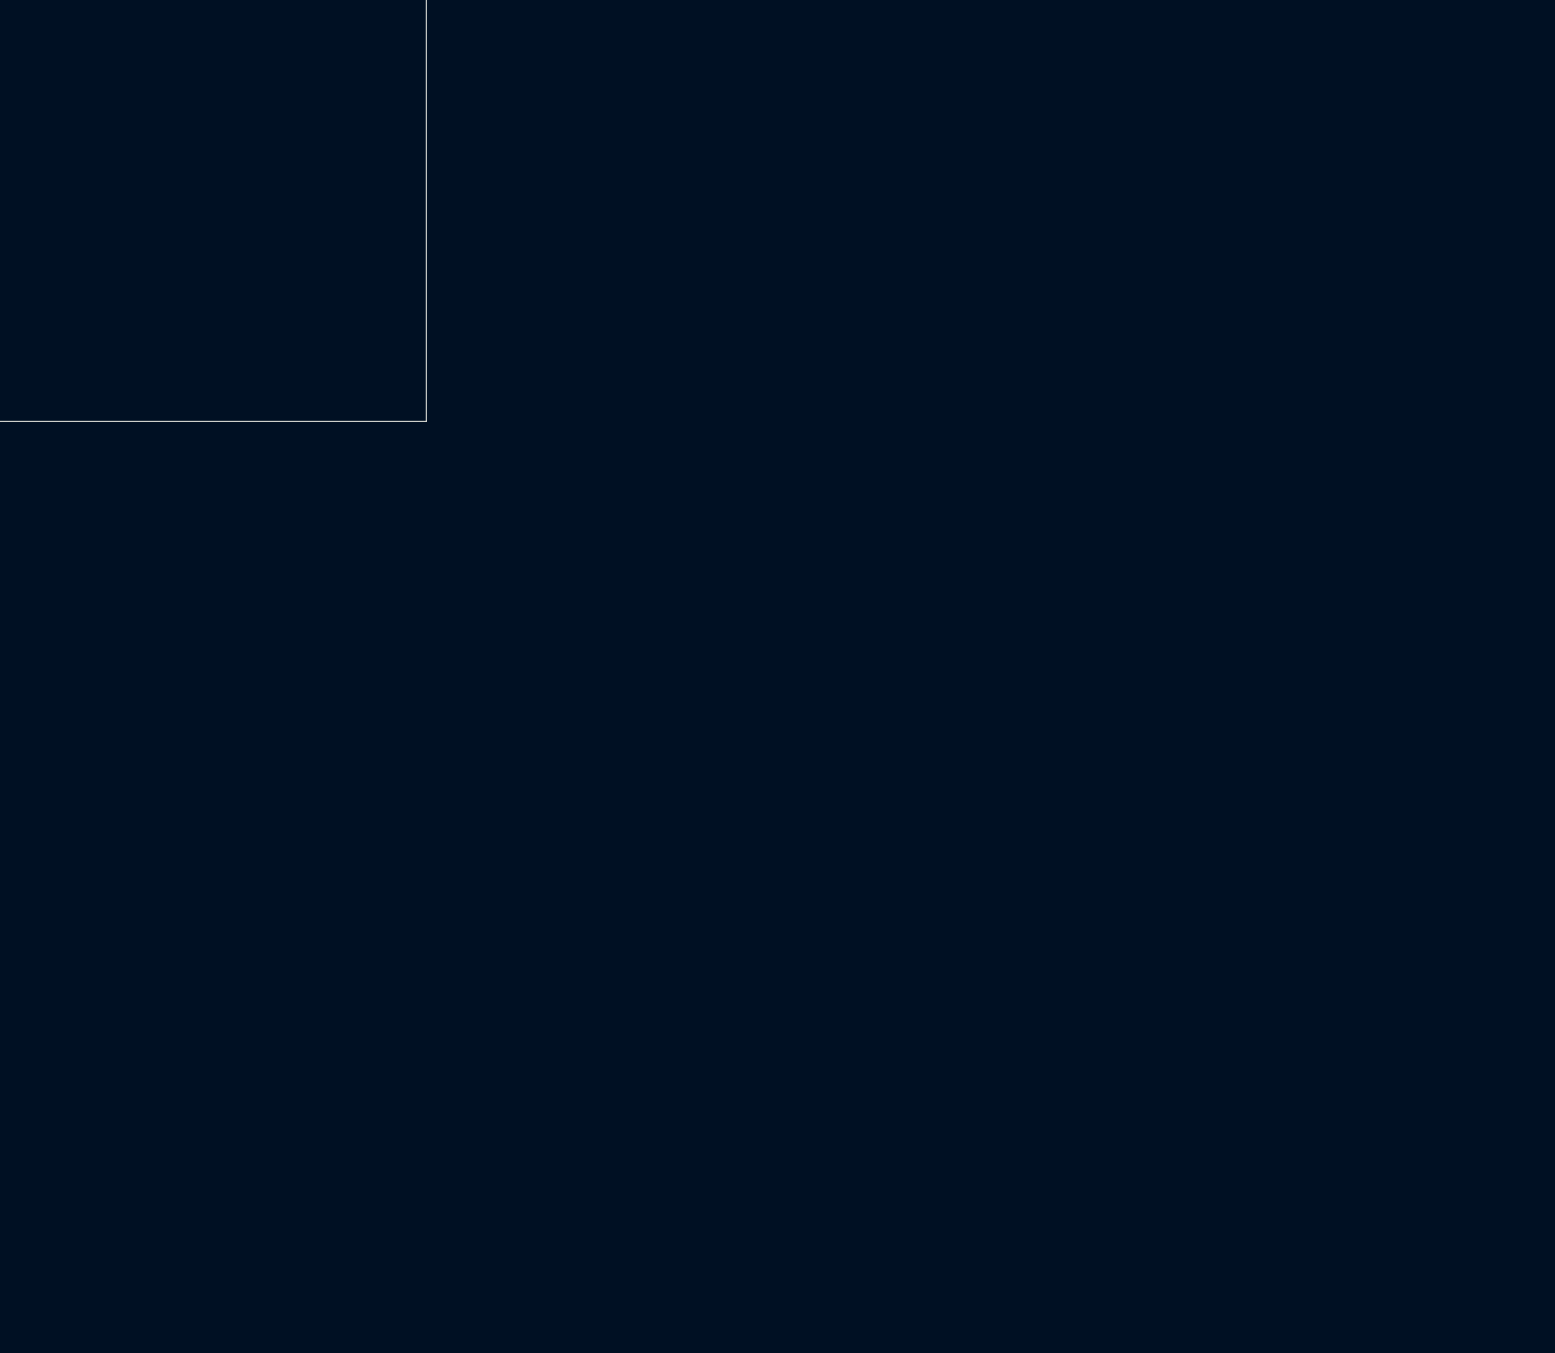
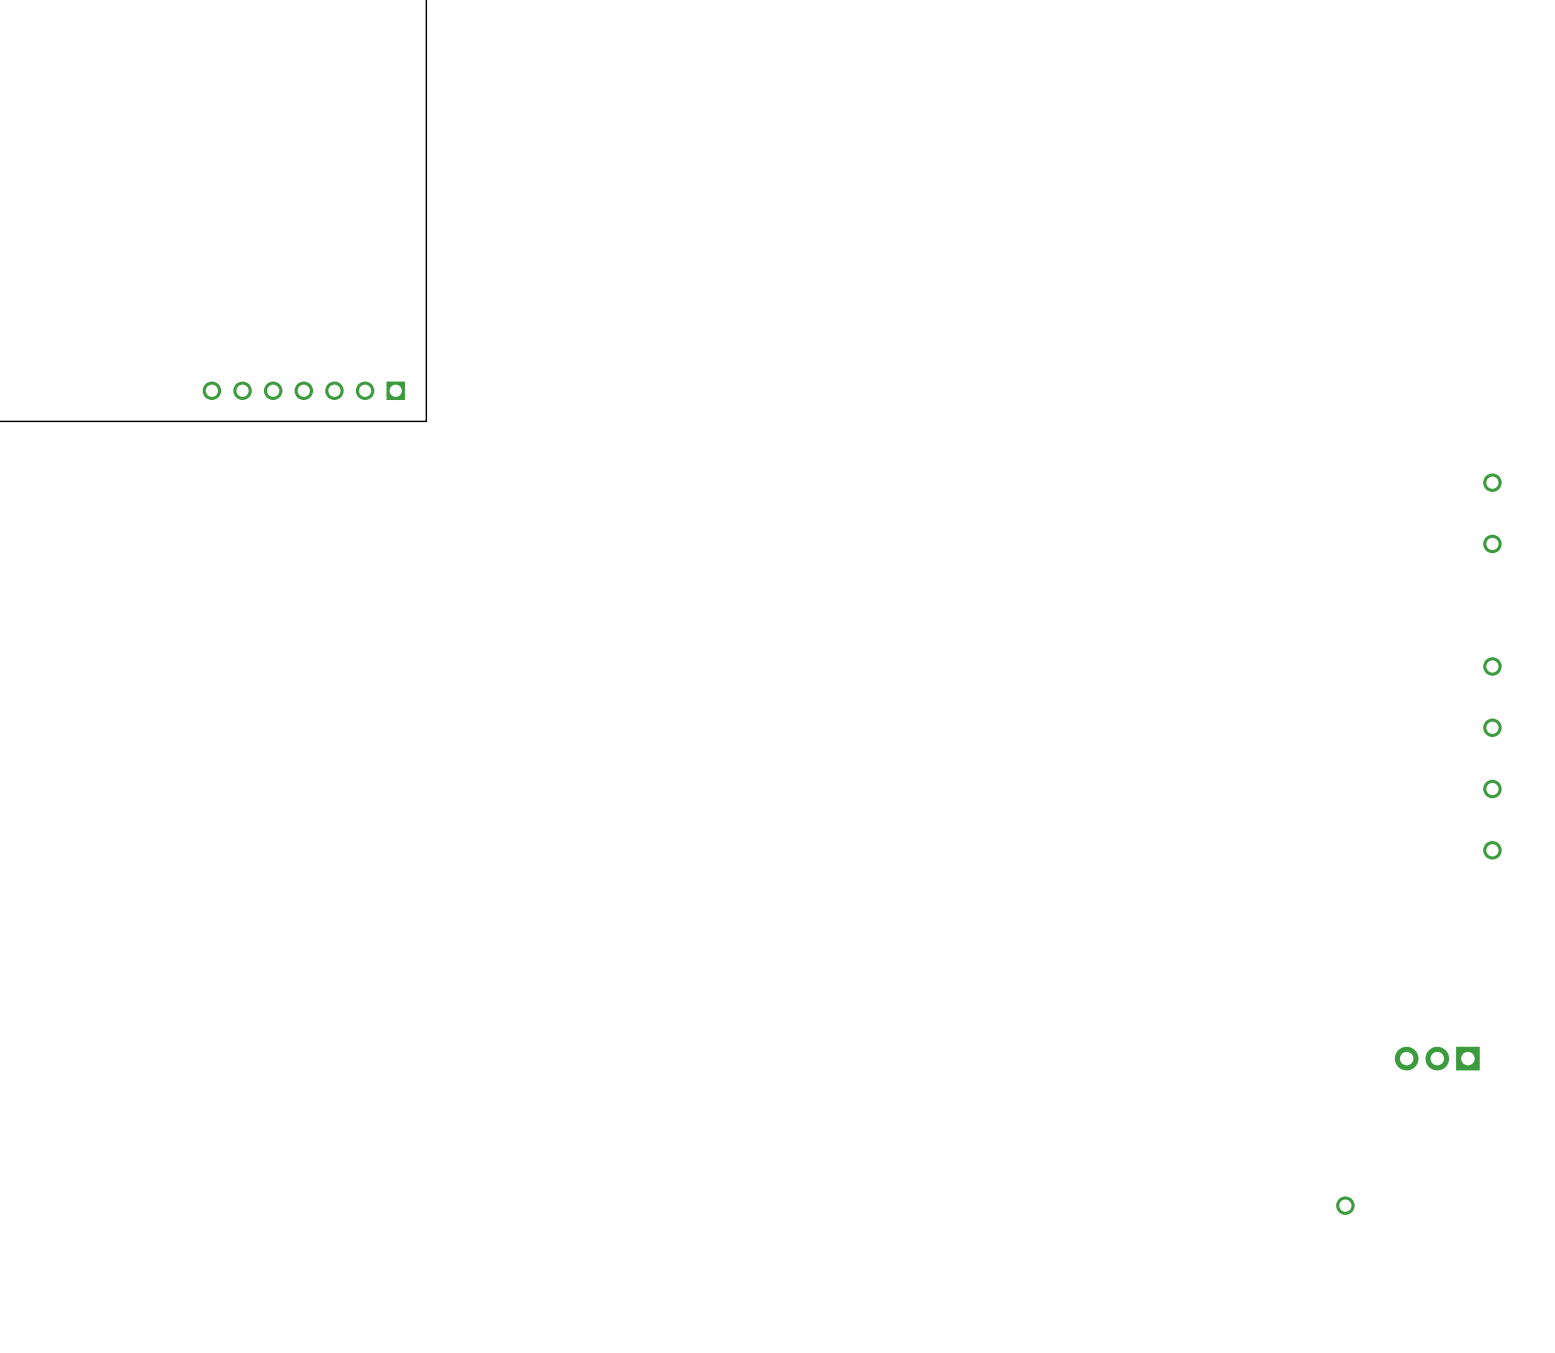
part: none -> (303, 390)
part: none -> (1492, 482)
part: none -> (1492, 543)
part: none -> (1492, 666)
part: none -> (1492, 727)
part: none -> (1492, 789)
part: none -> (1492, 850)
part: none -> (1437, 1058)
part: none -> (1345, 1205)

